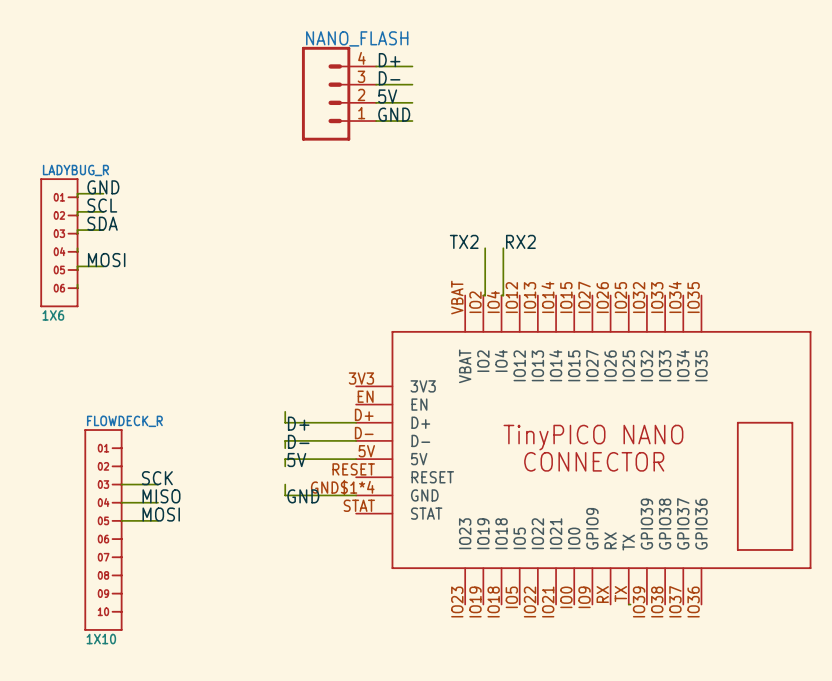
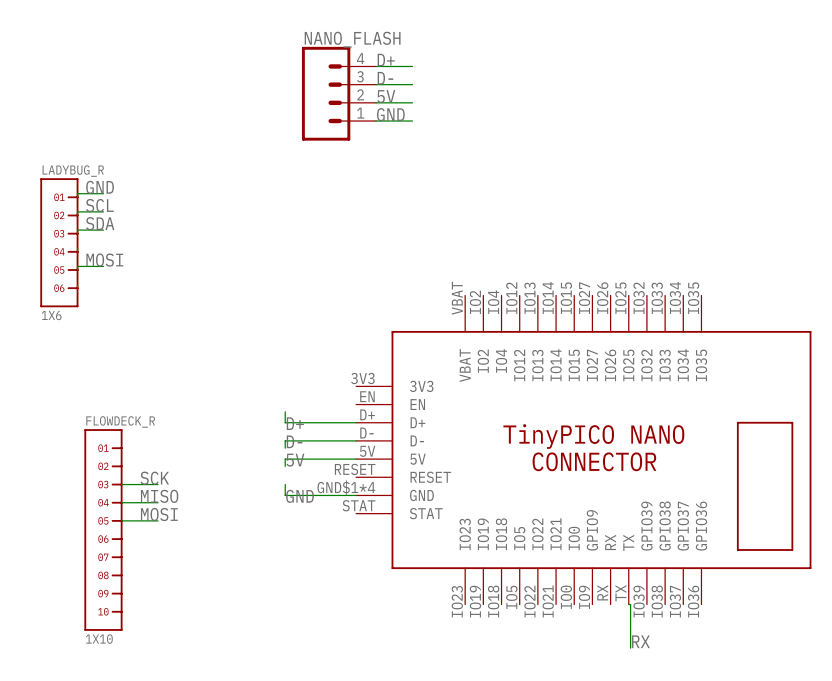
label: TX2 (464, 241) -> none
label: RX2 (520, 241) -> none
wire: (485, 248) (485, 295) (483, 295) -> none
wire: (503, 248) (503, 295) (501, 295) -> none
wire: none -> (630, 604) (630, 648)
label: none -> RX (640, 641)

